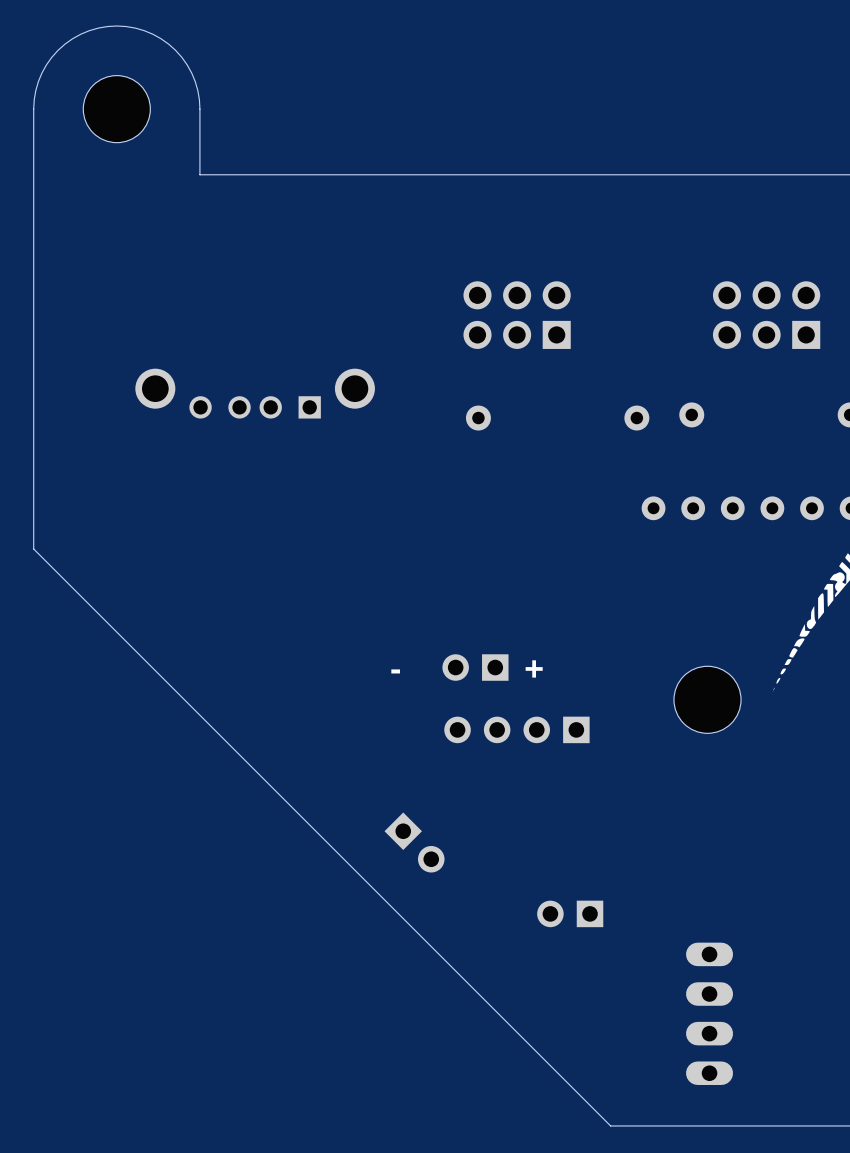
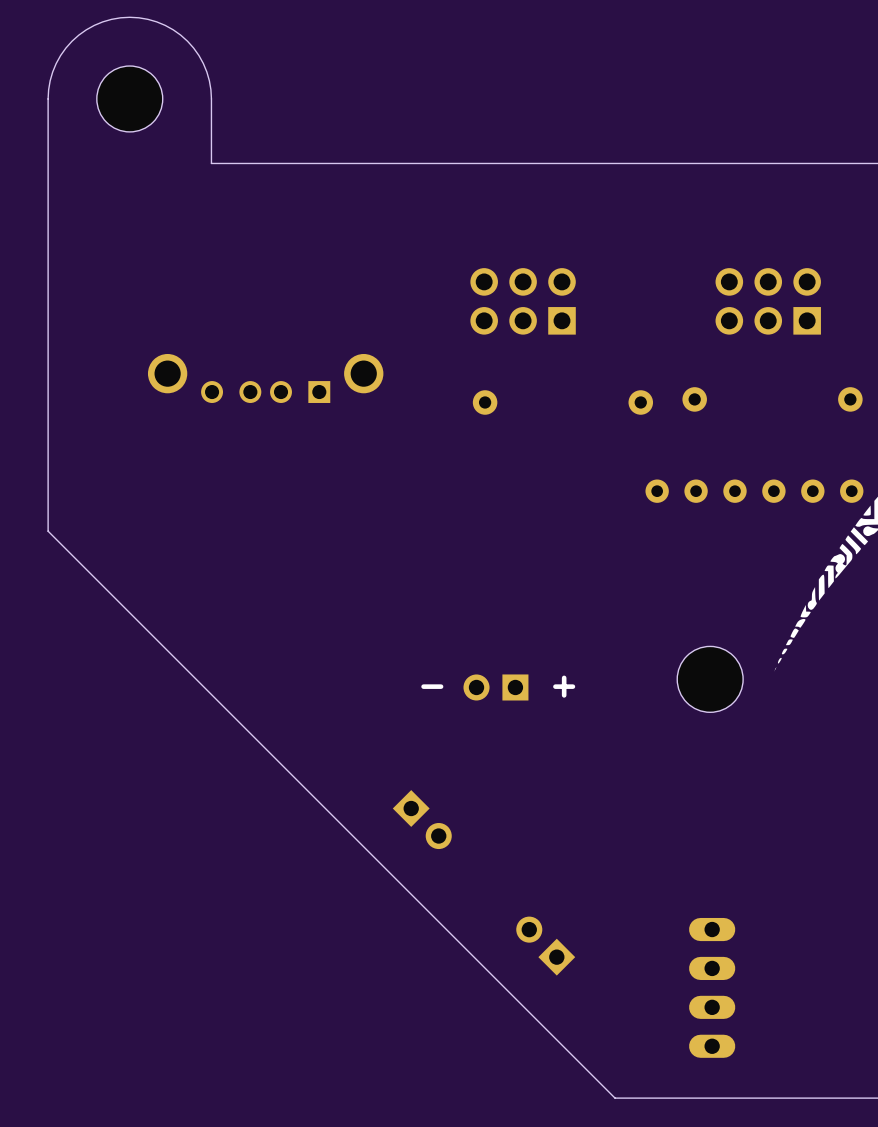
part position: (475, 667) -> (495, 687)
text position: + (534, 668) -> + (564, 686)
text position: - (395, 671) -> - (432, 686)
part: (516, 729) -> none
part: (570, 913) -> none
part: none -> (545, 946)

